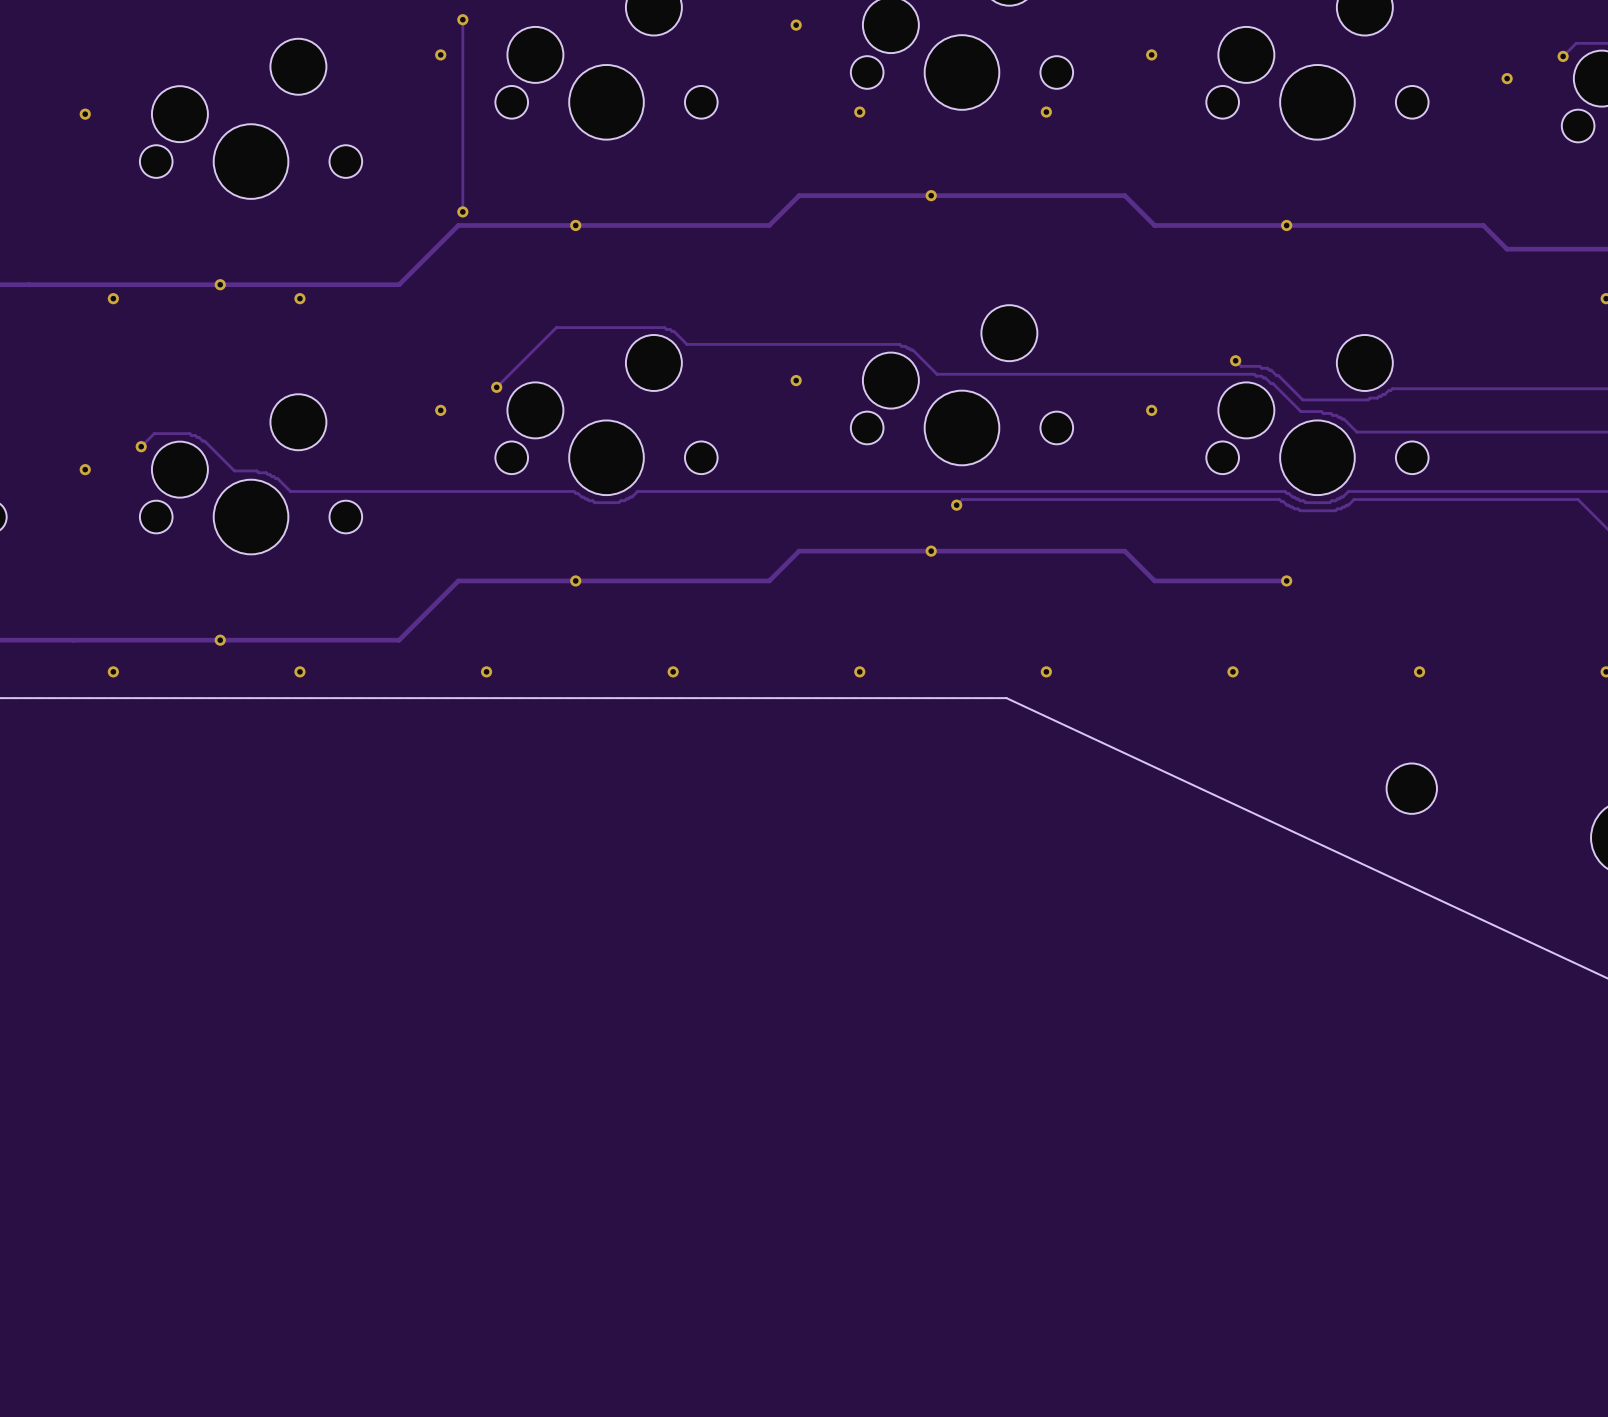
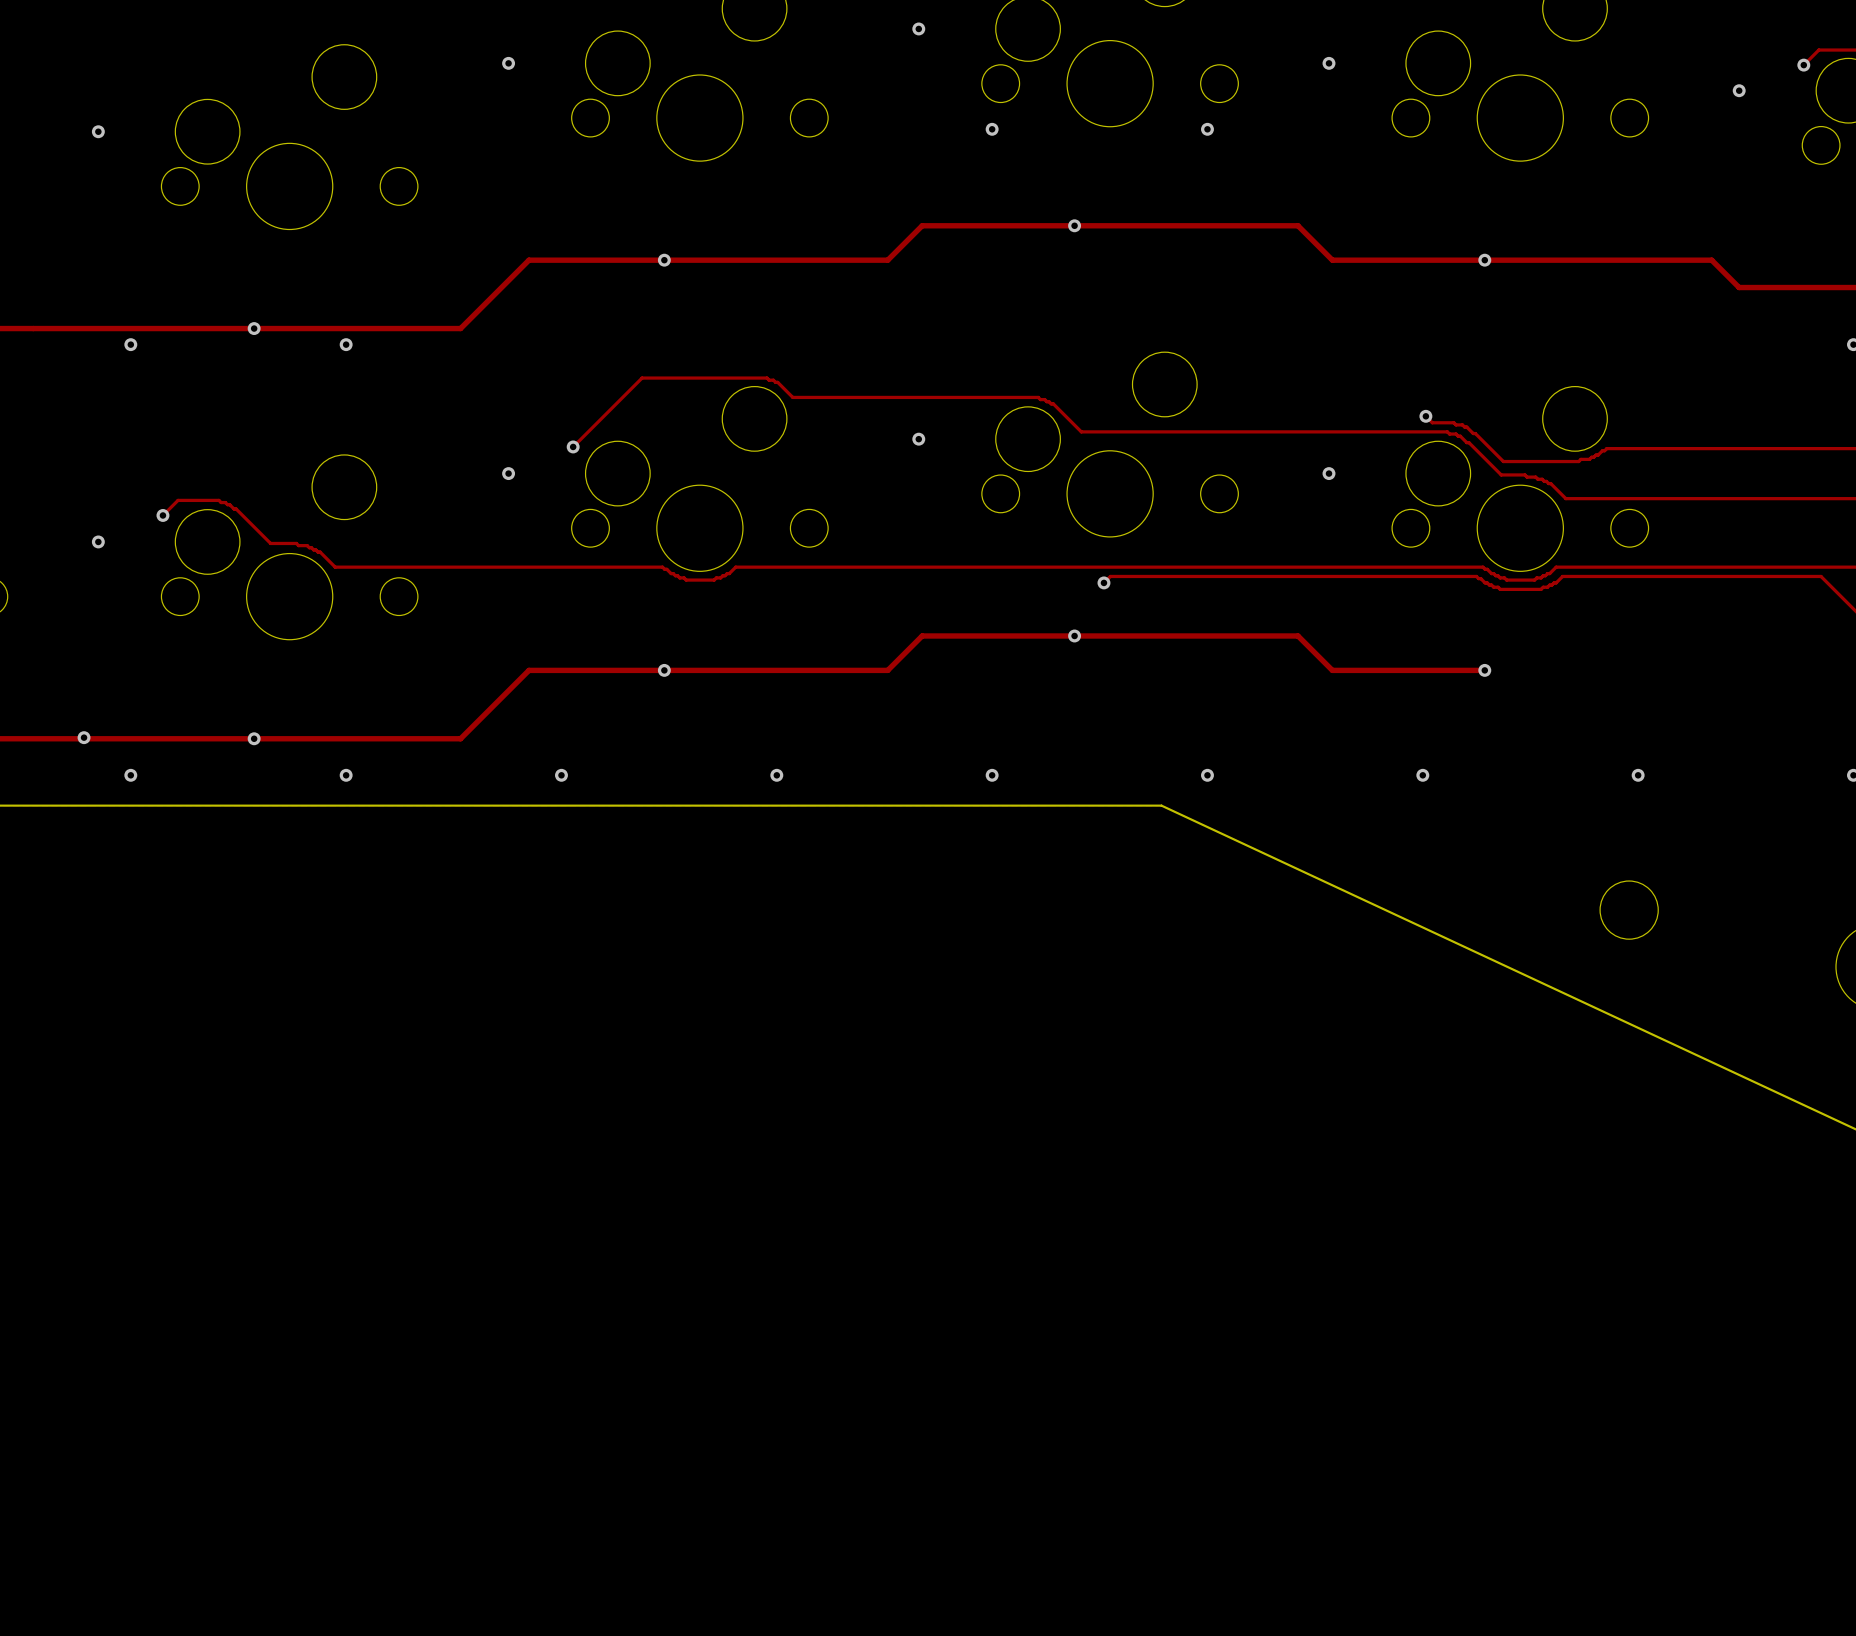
track: (462, 19) (462, 211) -> none
via: (462, 19) -> none
via: (462, 211) -> none
via: none -> (84, 737)

